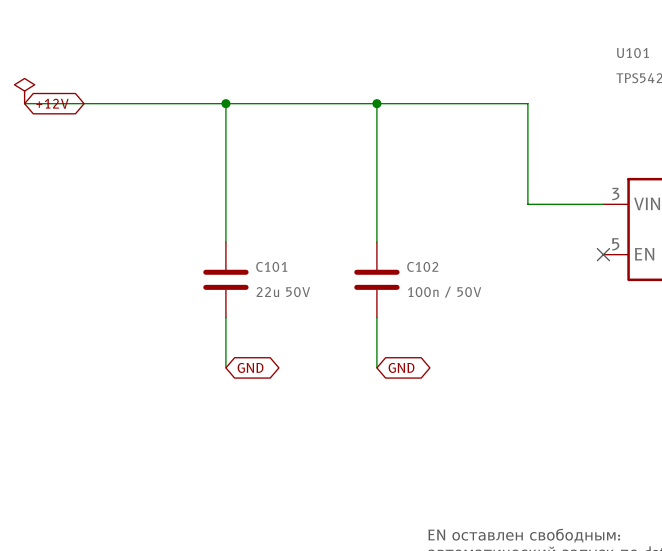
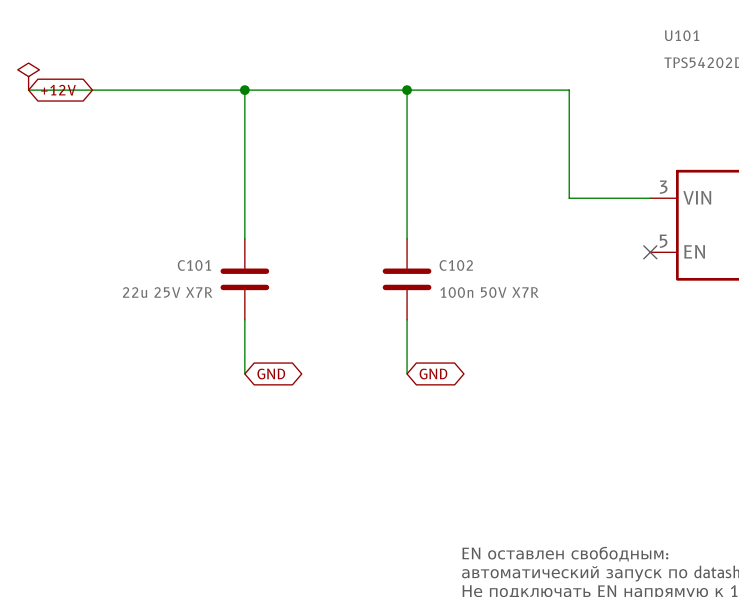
C101 name position: C101 (271, 266) -> C101 (194, 265)
C101 value: 22u 50V (283, 292) -> 22u 25V X7R (167, 292)
C102 value: 100n / 50V (444, 292) -> 100n 50V X7R (489, 292)

